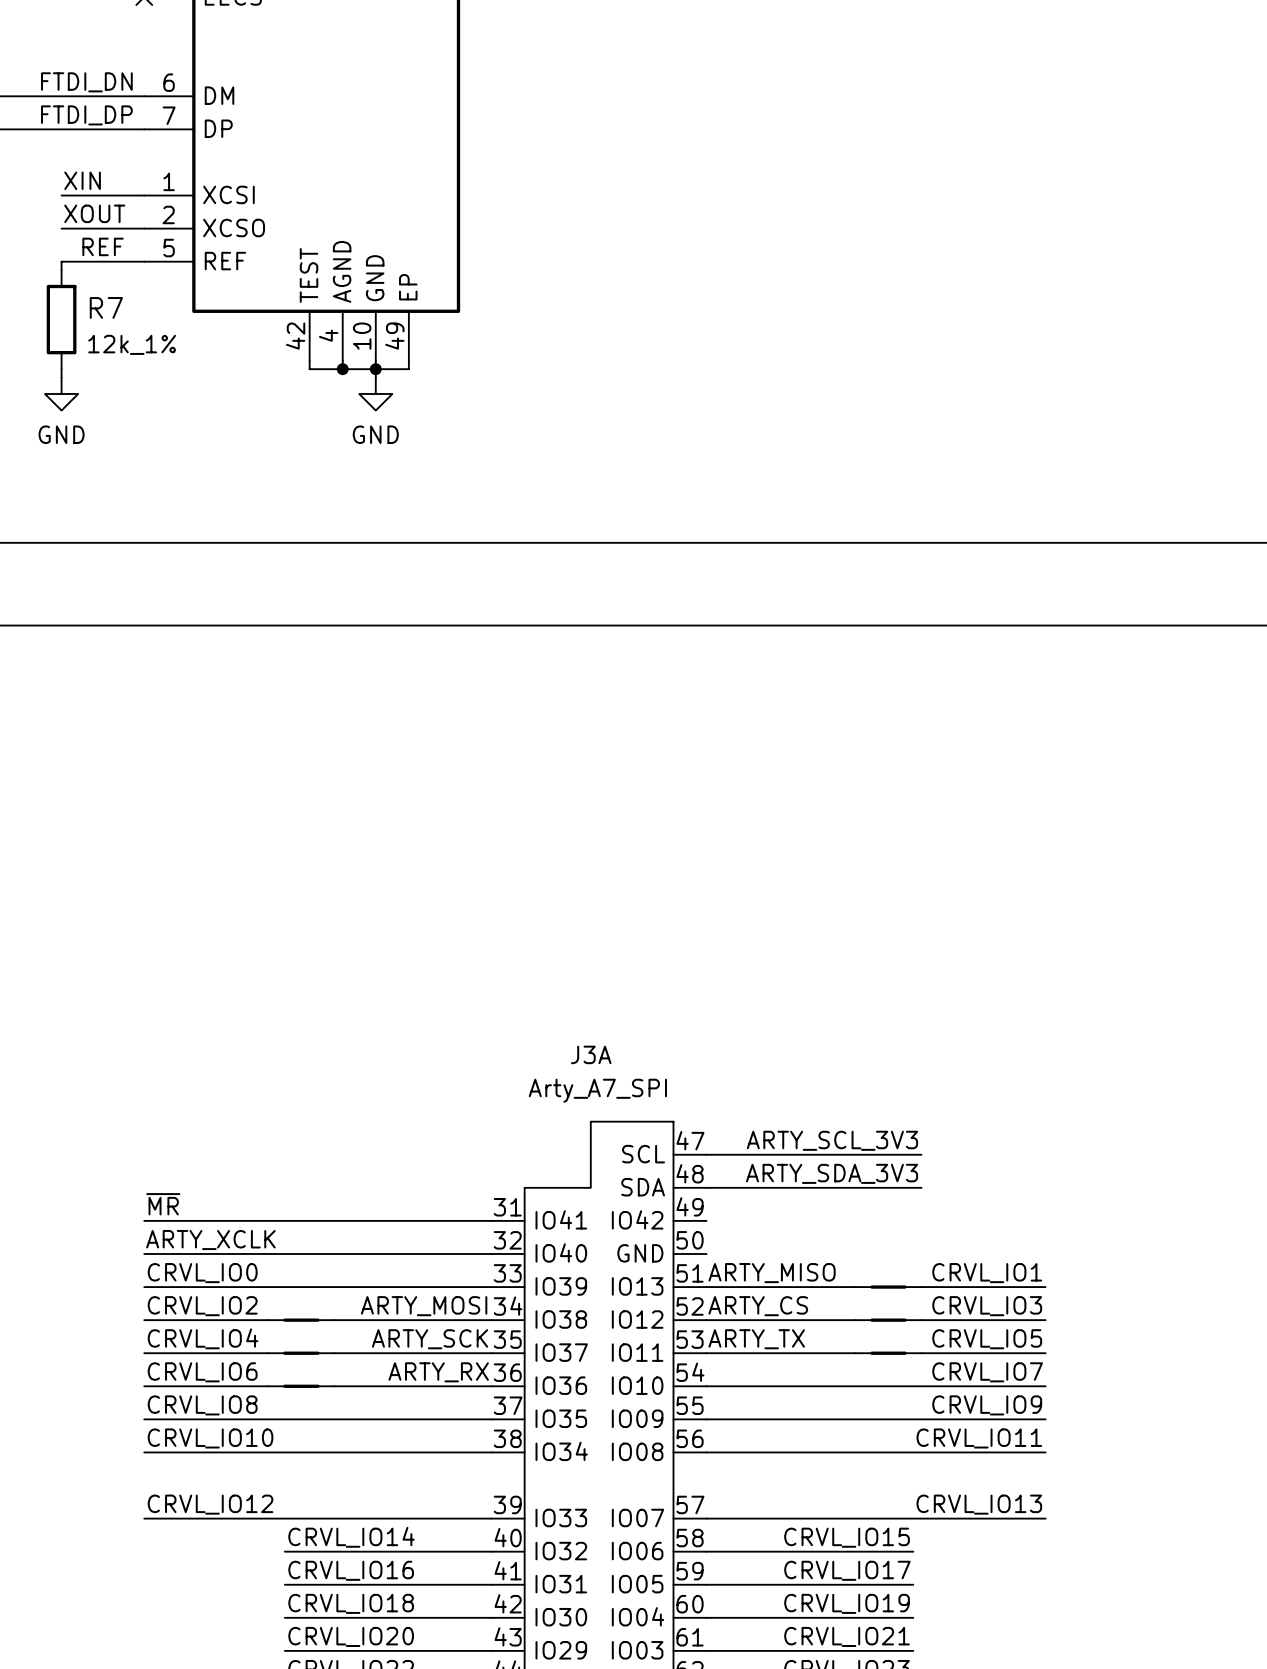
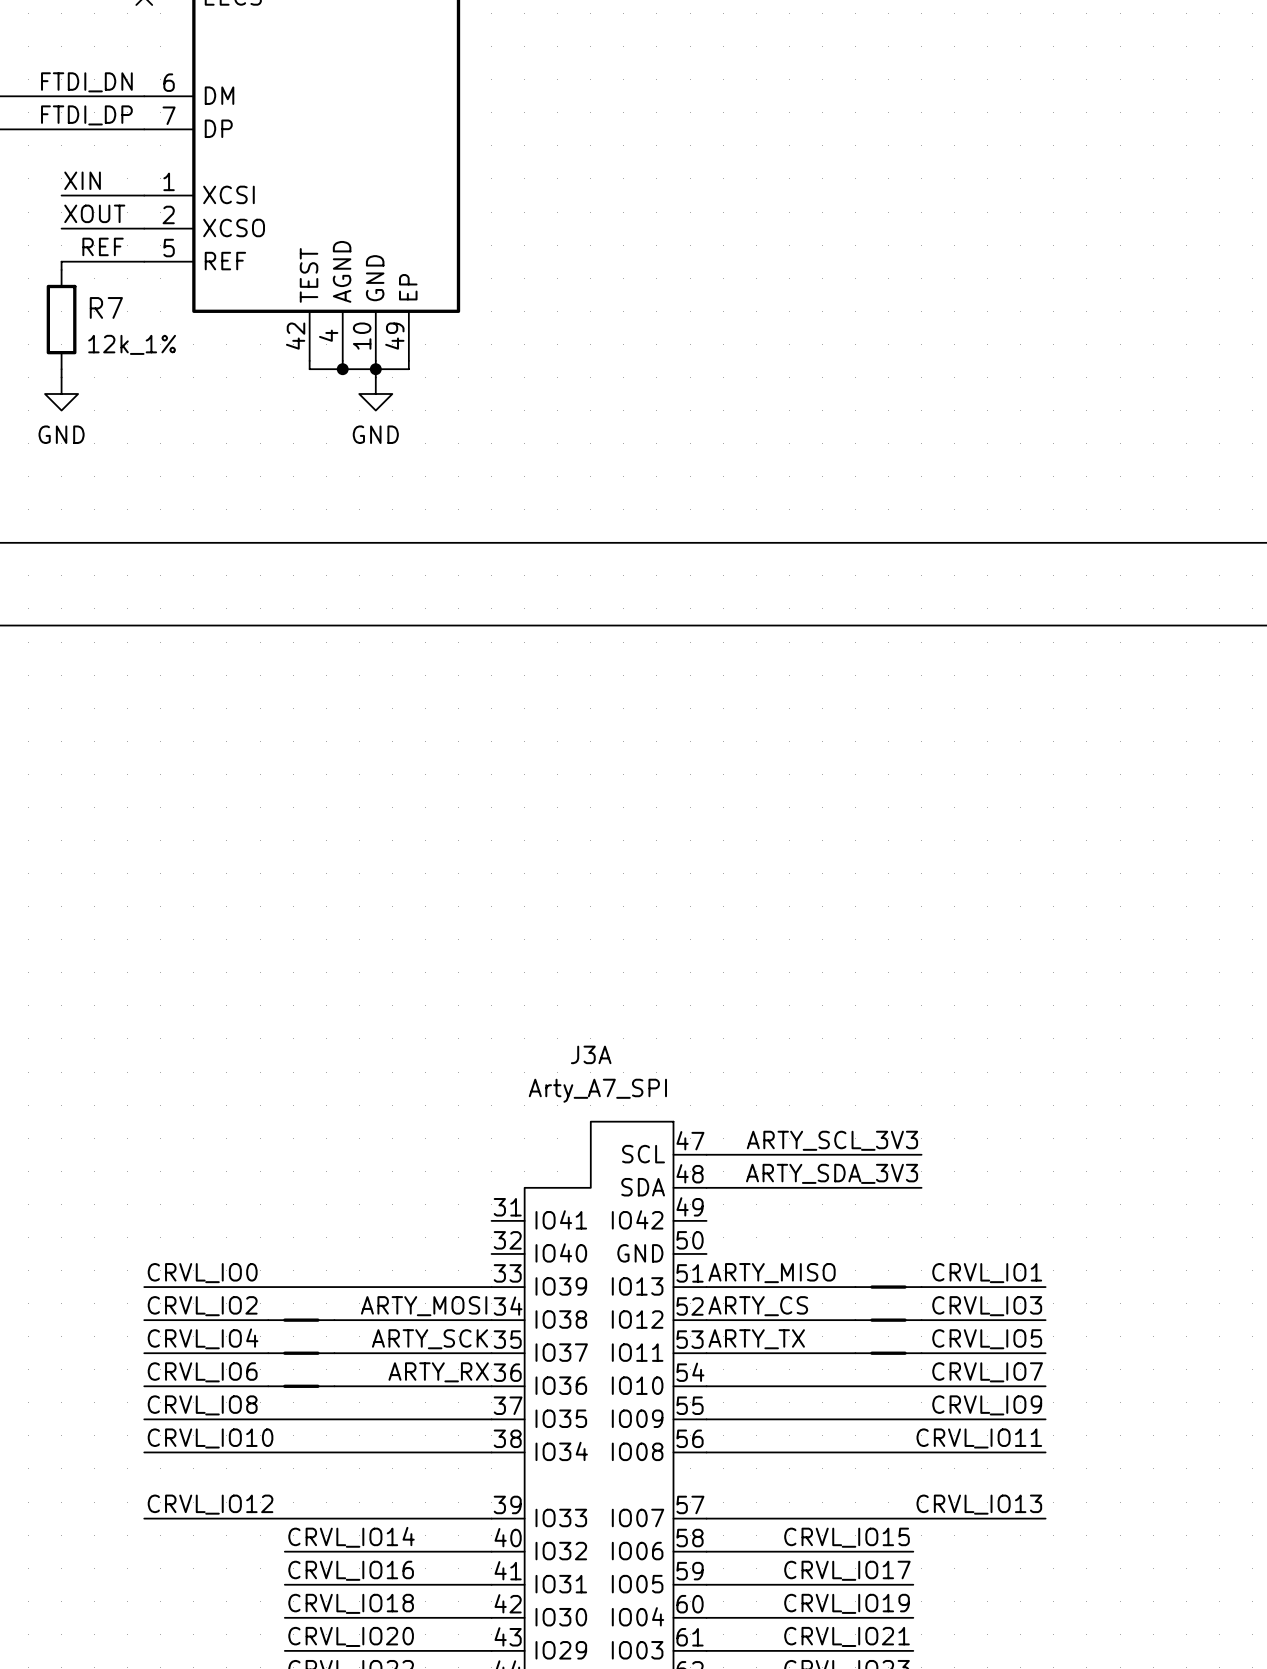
label: ~{MR} (163, 1204) -> none
wire: (144, 1220) (491, 1220) -> none
label: ARTY_XCLK (210, 1240) -> none
wire: (144, 1253) (491, 1253) -> none

